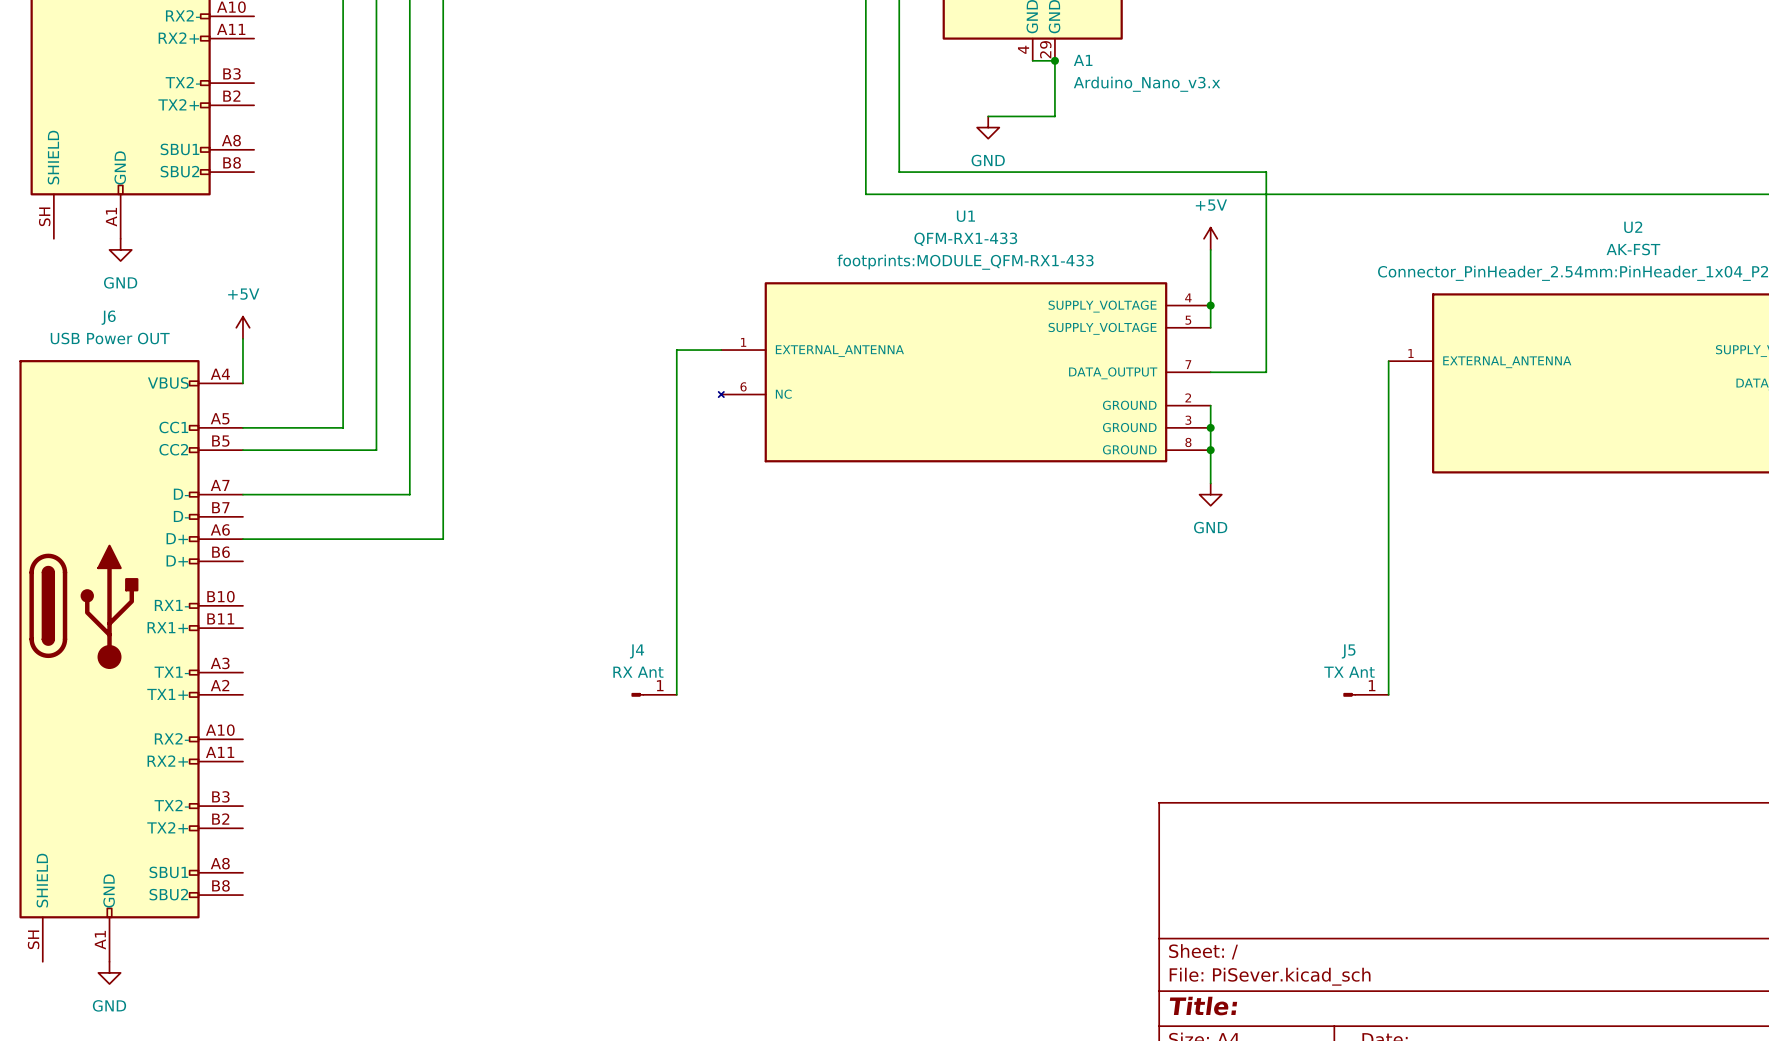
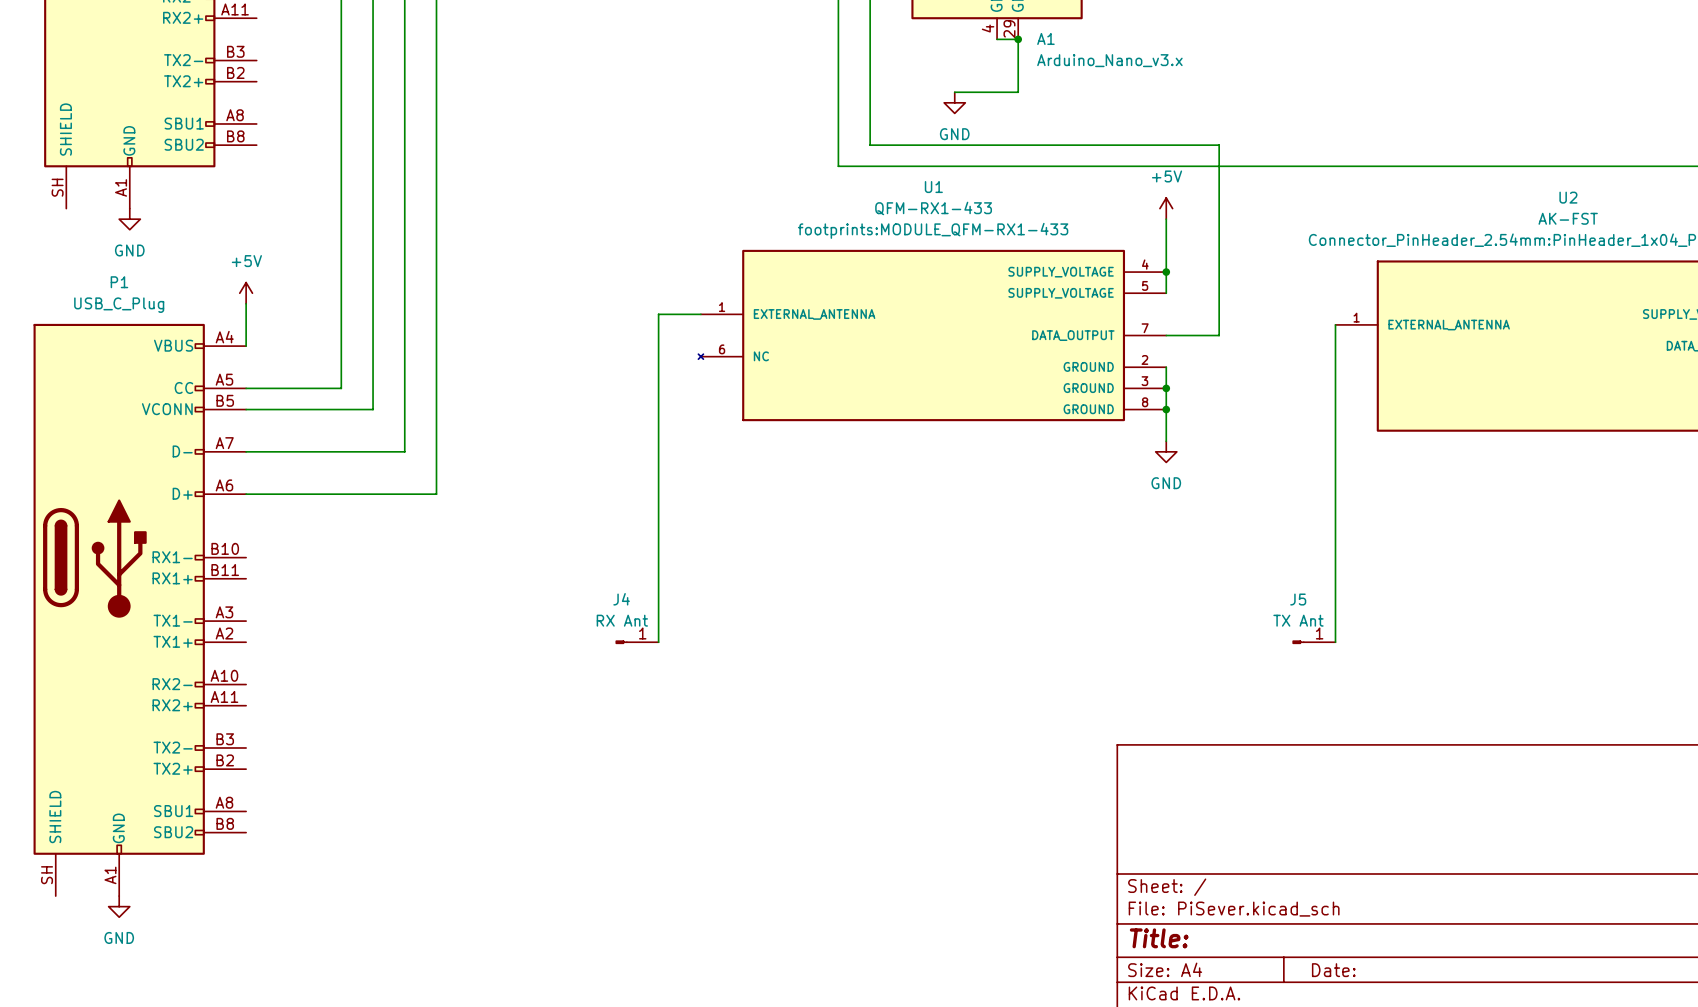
J6: USB Power OUT (131, 660) -> none
P1: none -> USB_C_Plug (139, 609)

